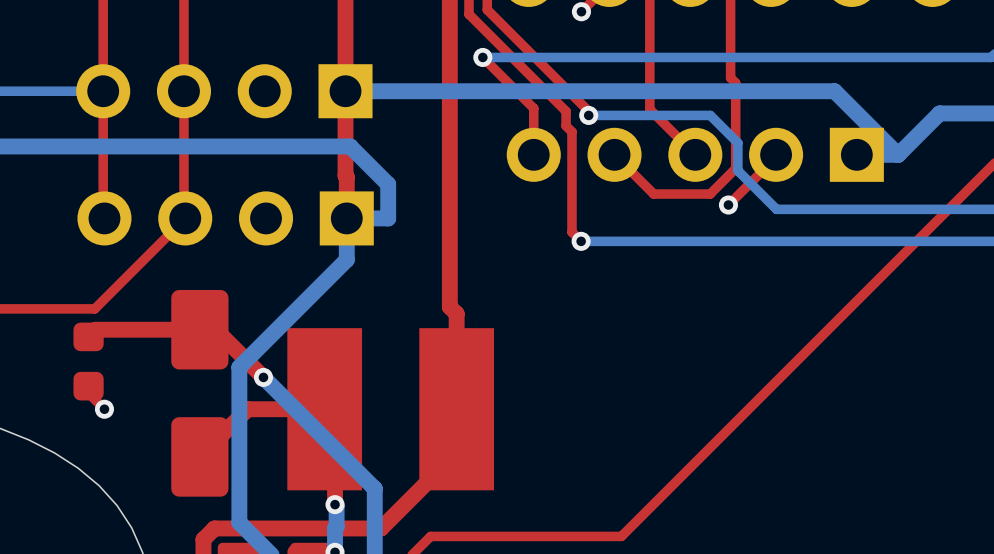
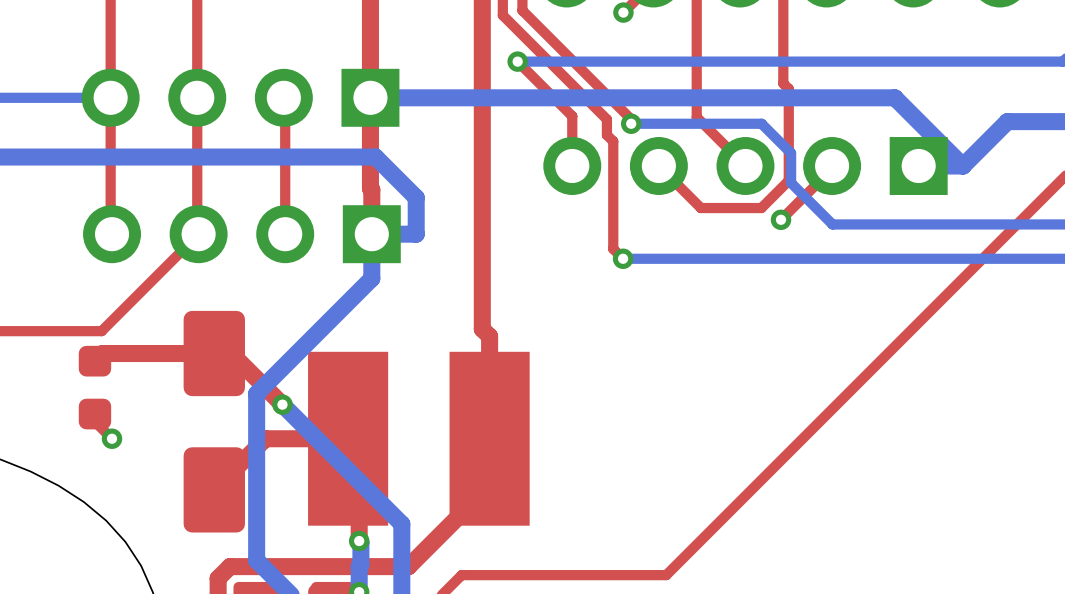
top track: none -> (283, 97) (285, 234)

